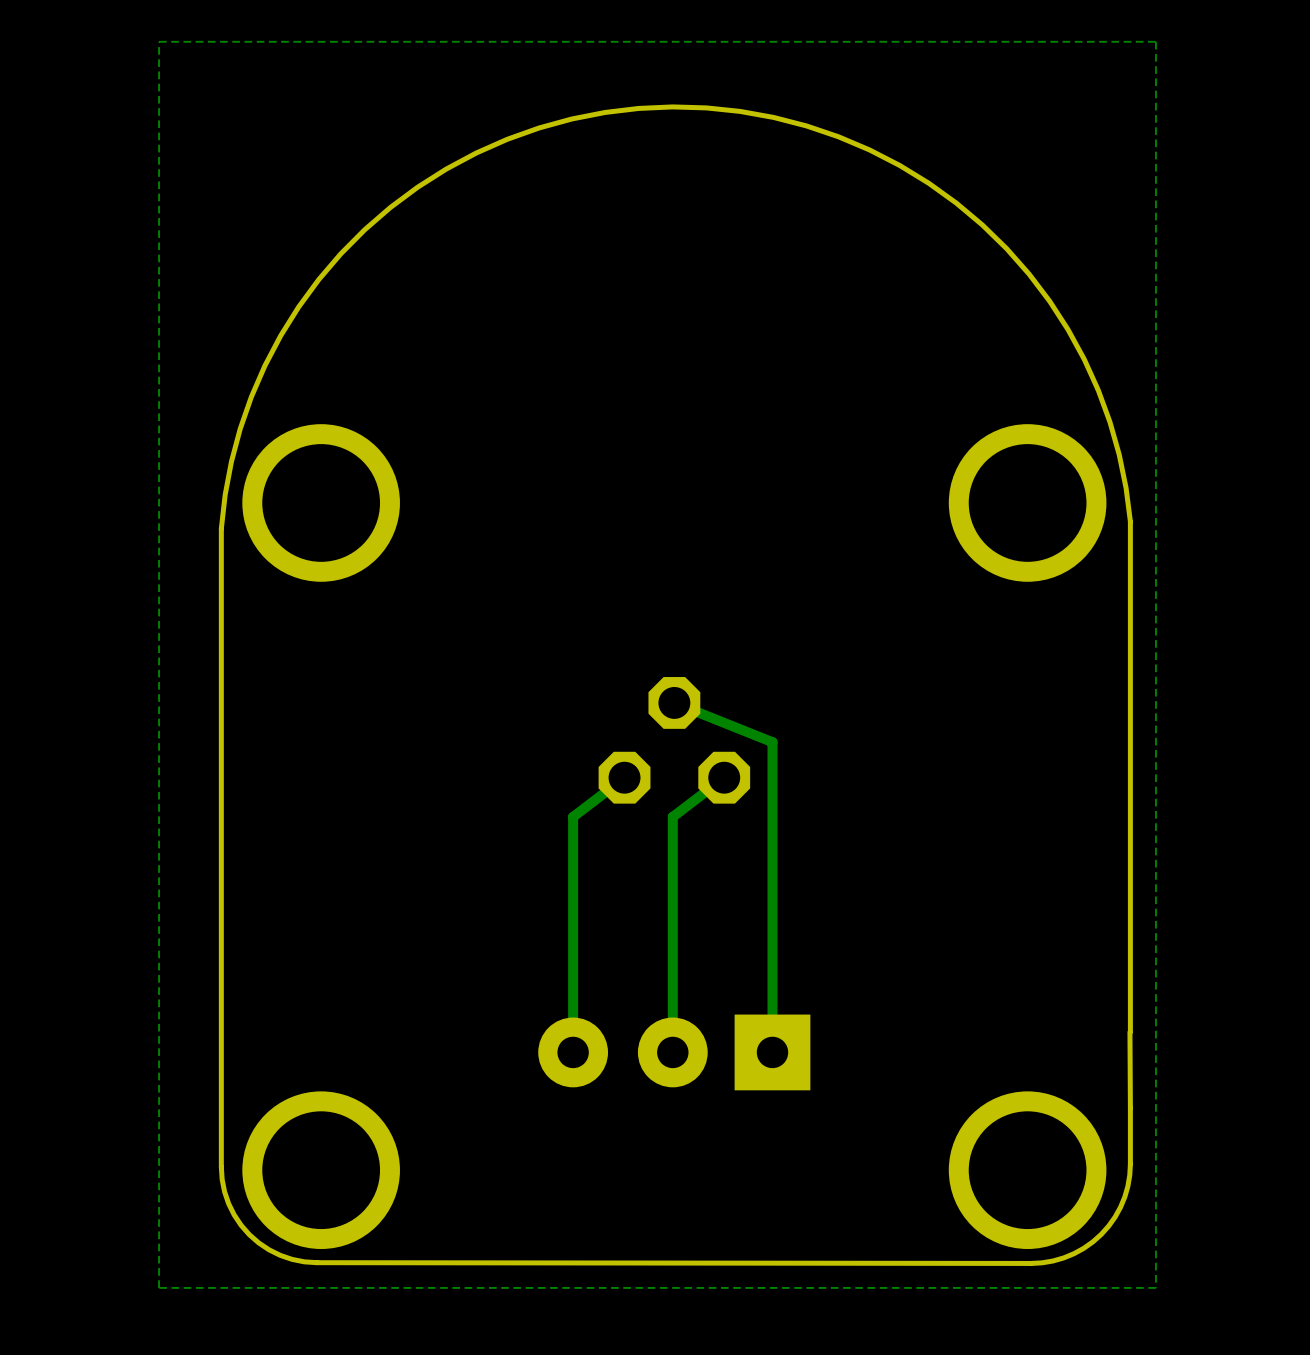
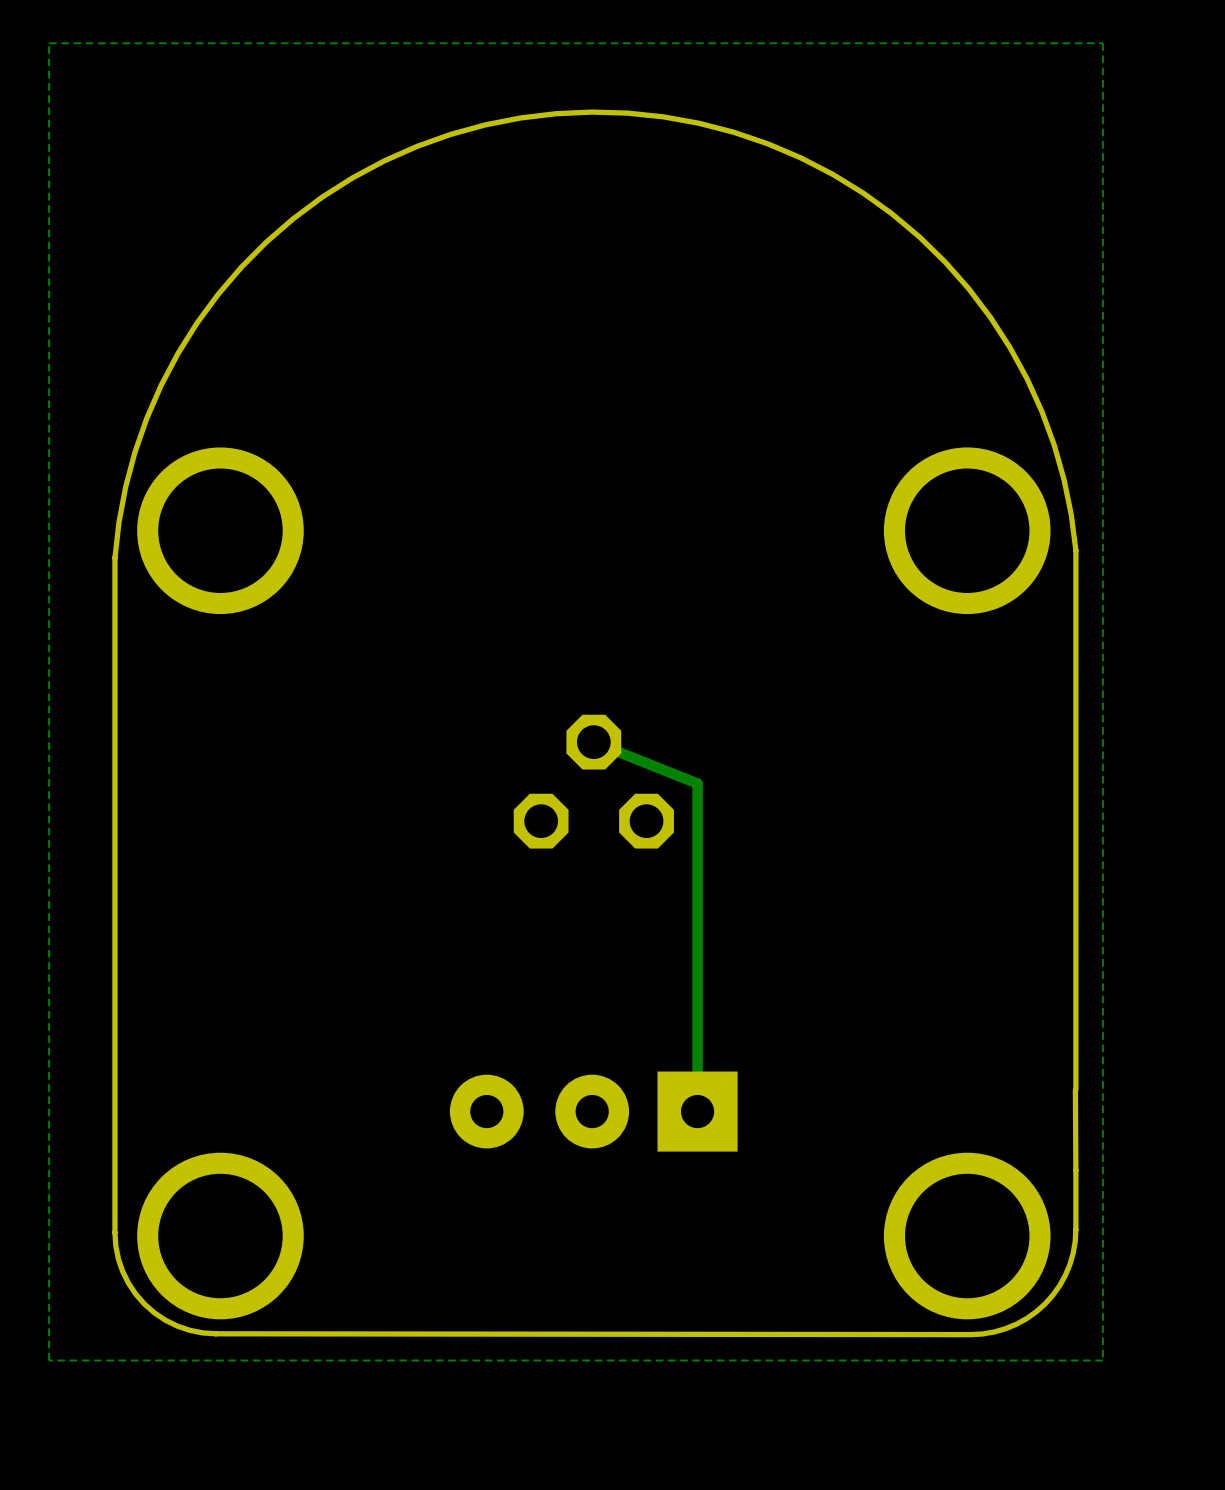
bottom track: (624, 777) (573, 816) (573, 1052) -> none
bottom track: (724, 777) (672, 816) (672, 1052) -> none

